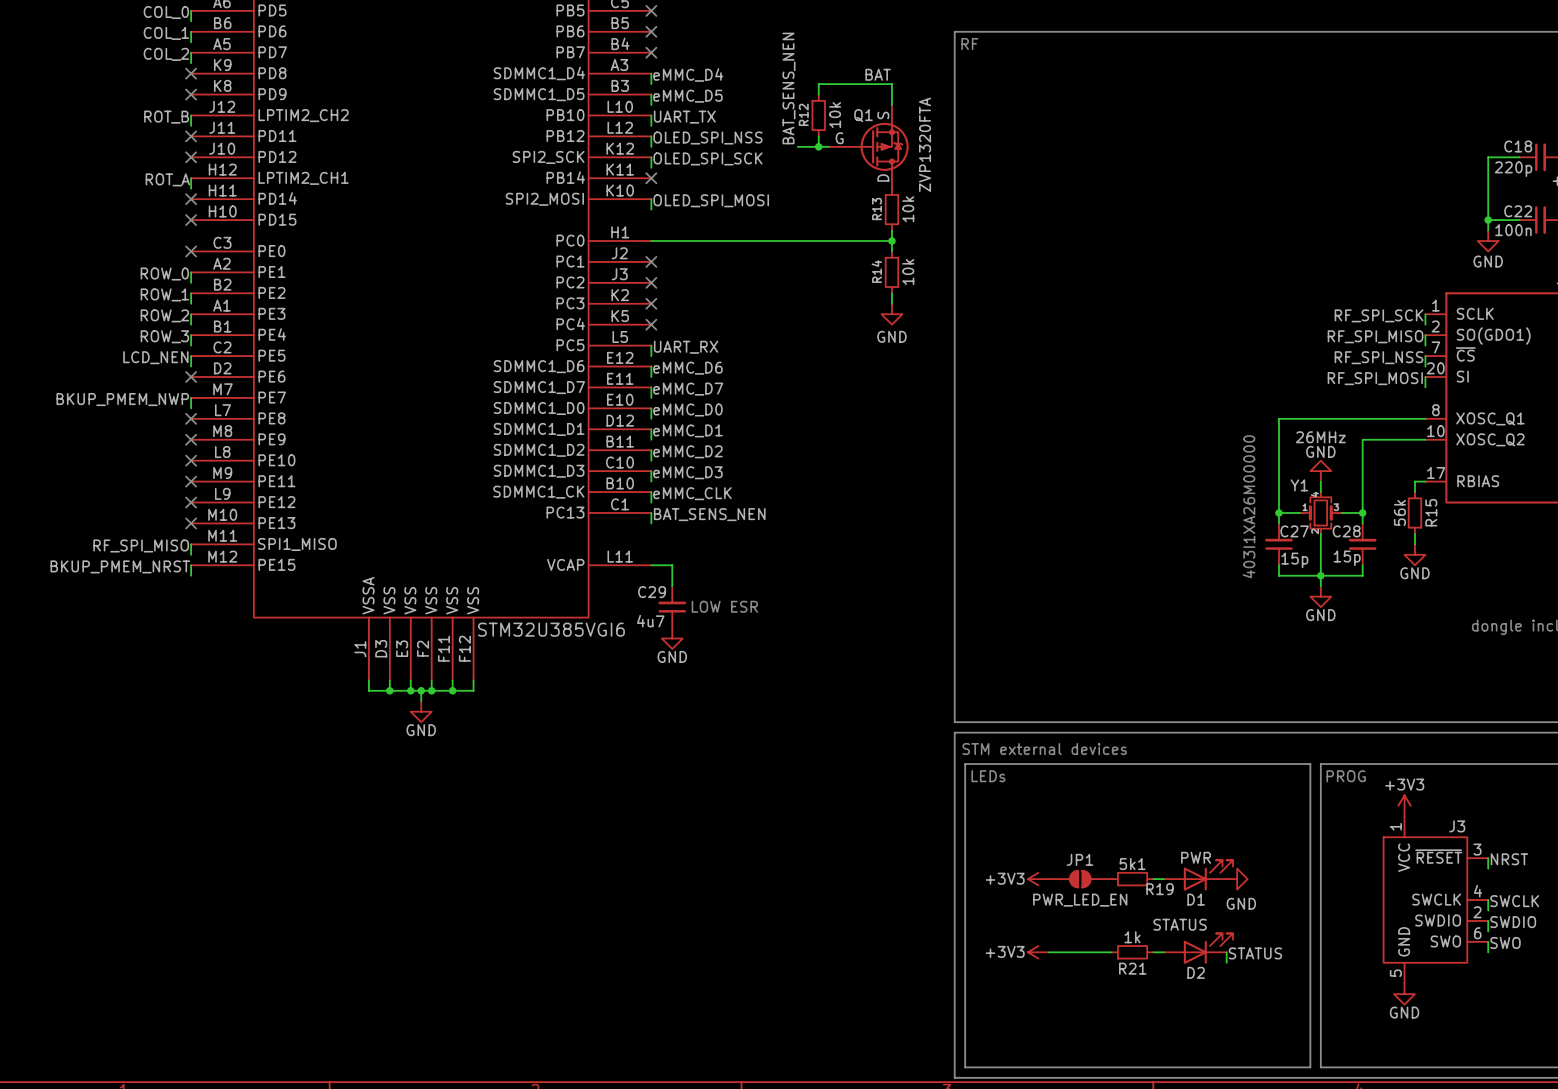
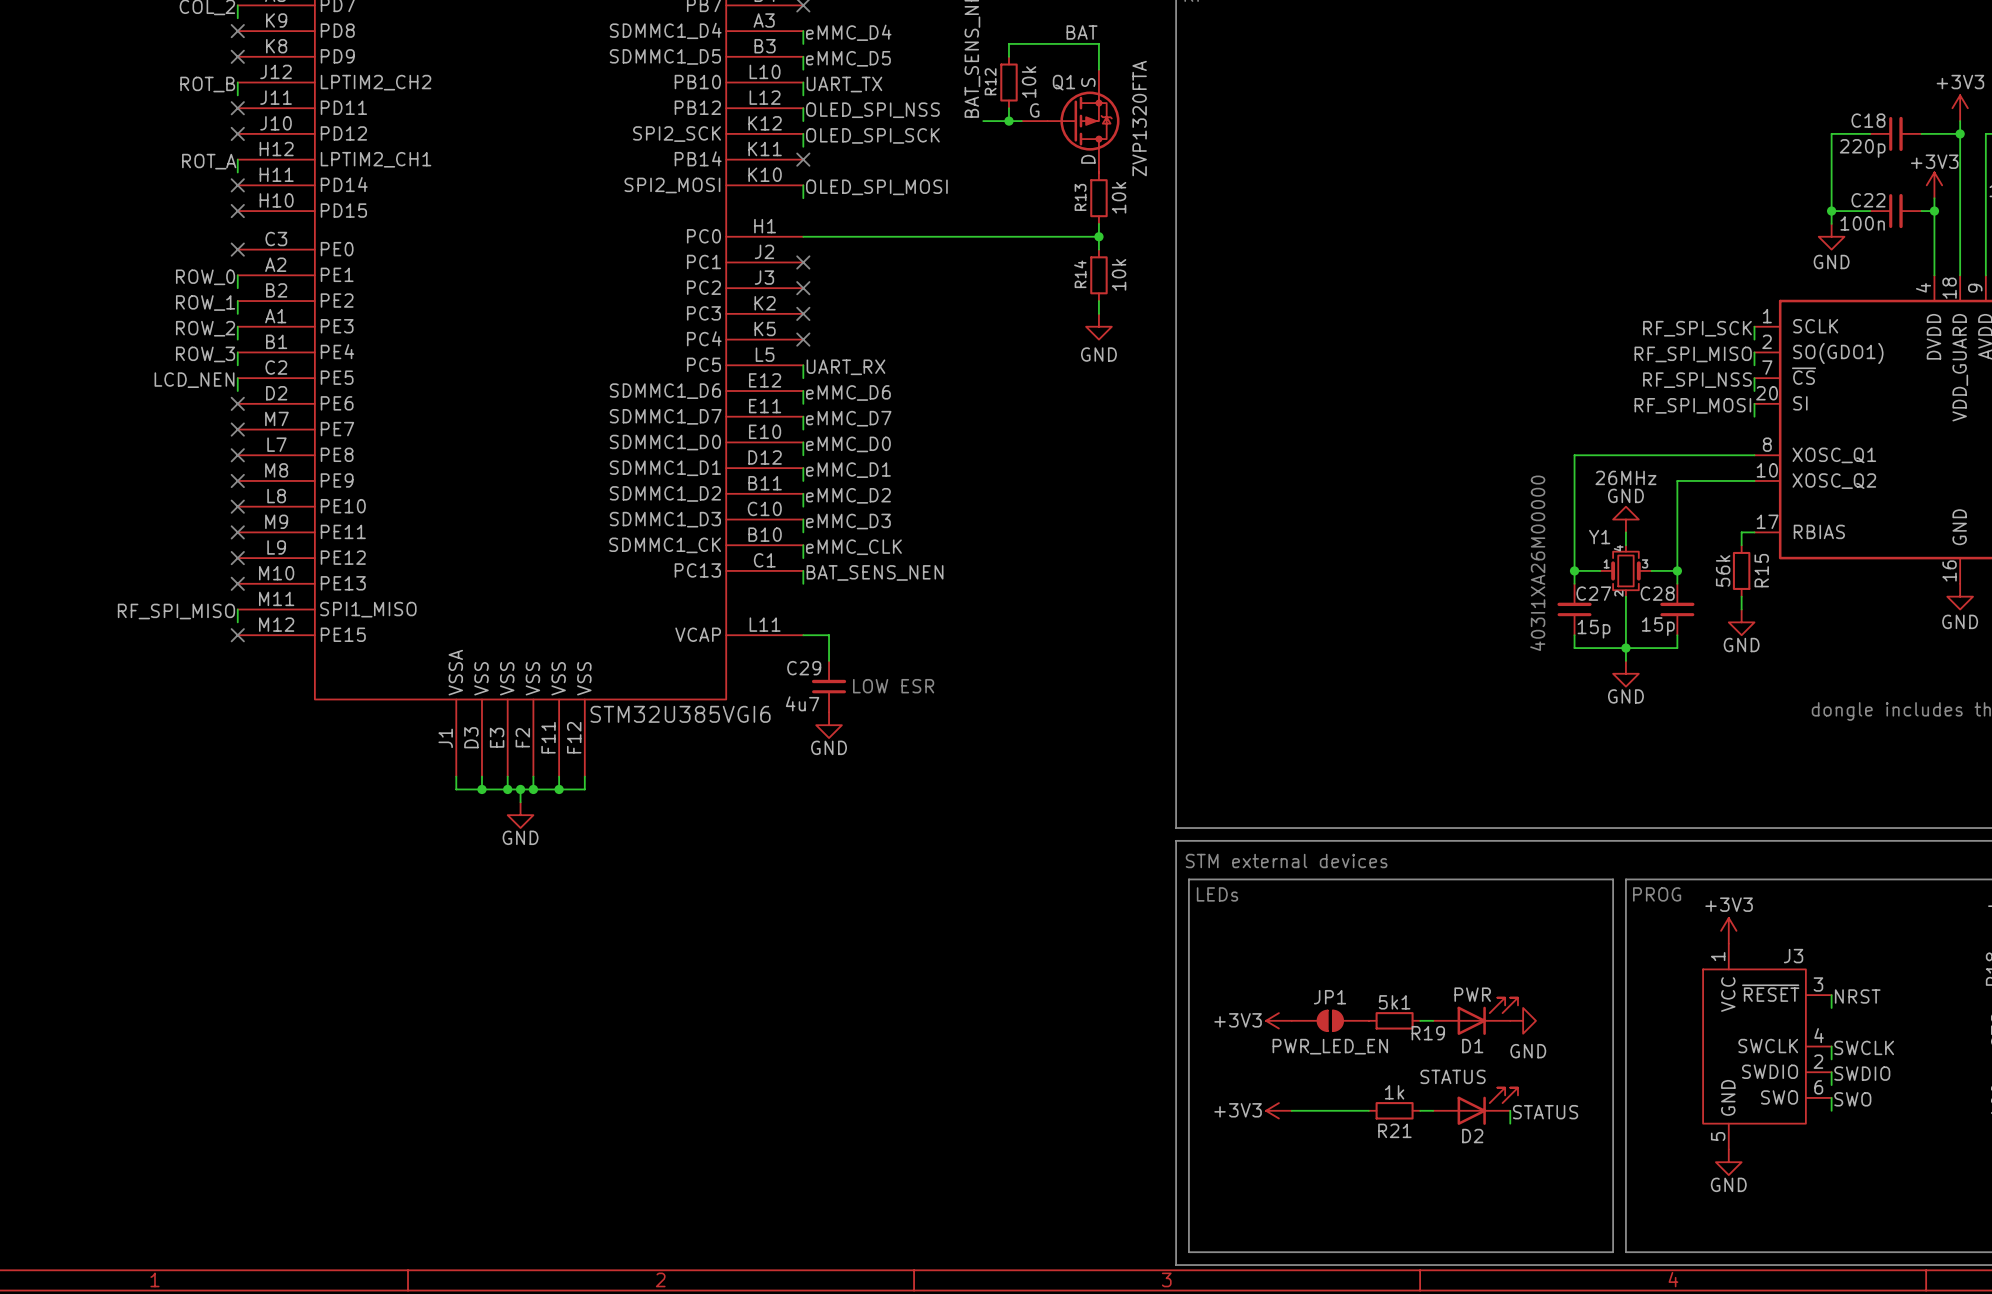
wire: (191, 397) (191, 408) -> none
no-connect mark: none -> (237, 429)
label: BKUP_PMEM_NWP (122, 399) -> none
wire: (191, 565) (191, 575) -> none
no-connect mark: none -> (237, 635)
label: BKUP_PMEM_NRST (120, 566) -> none

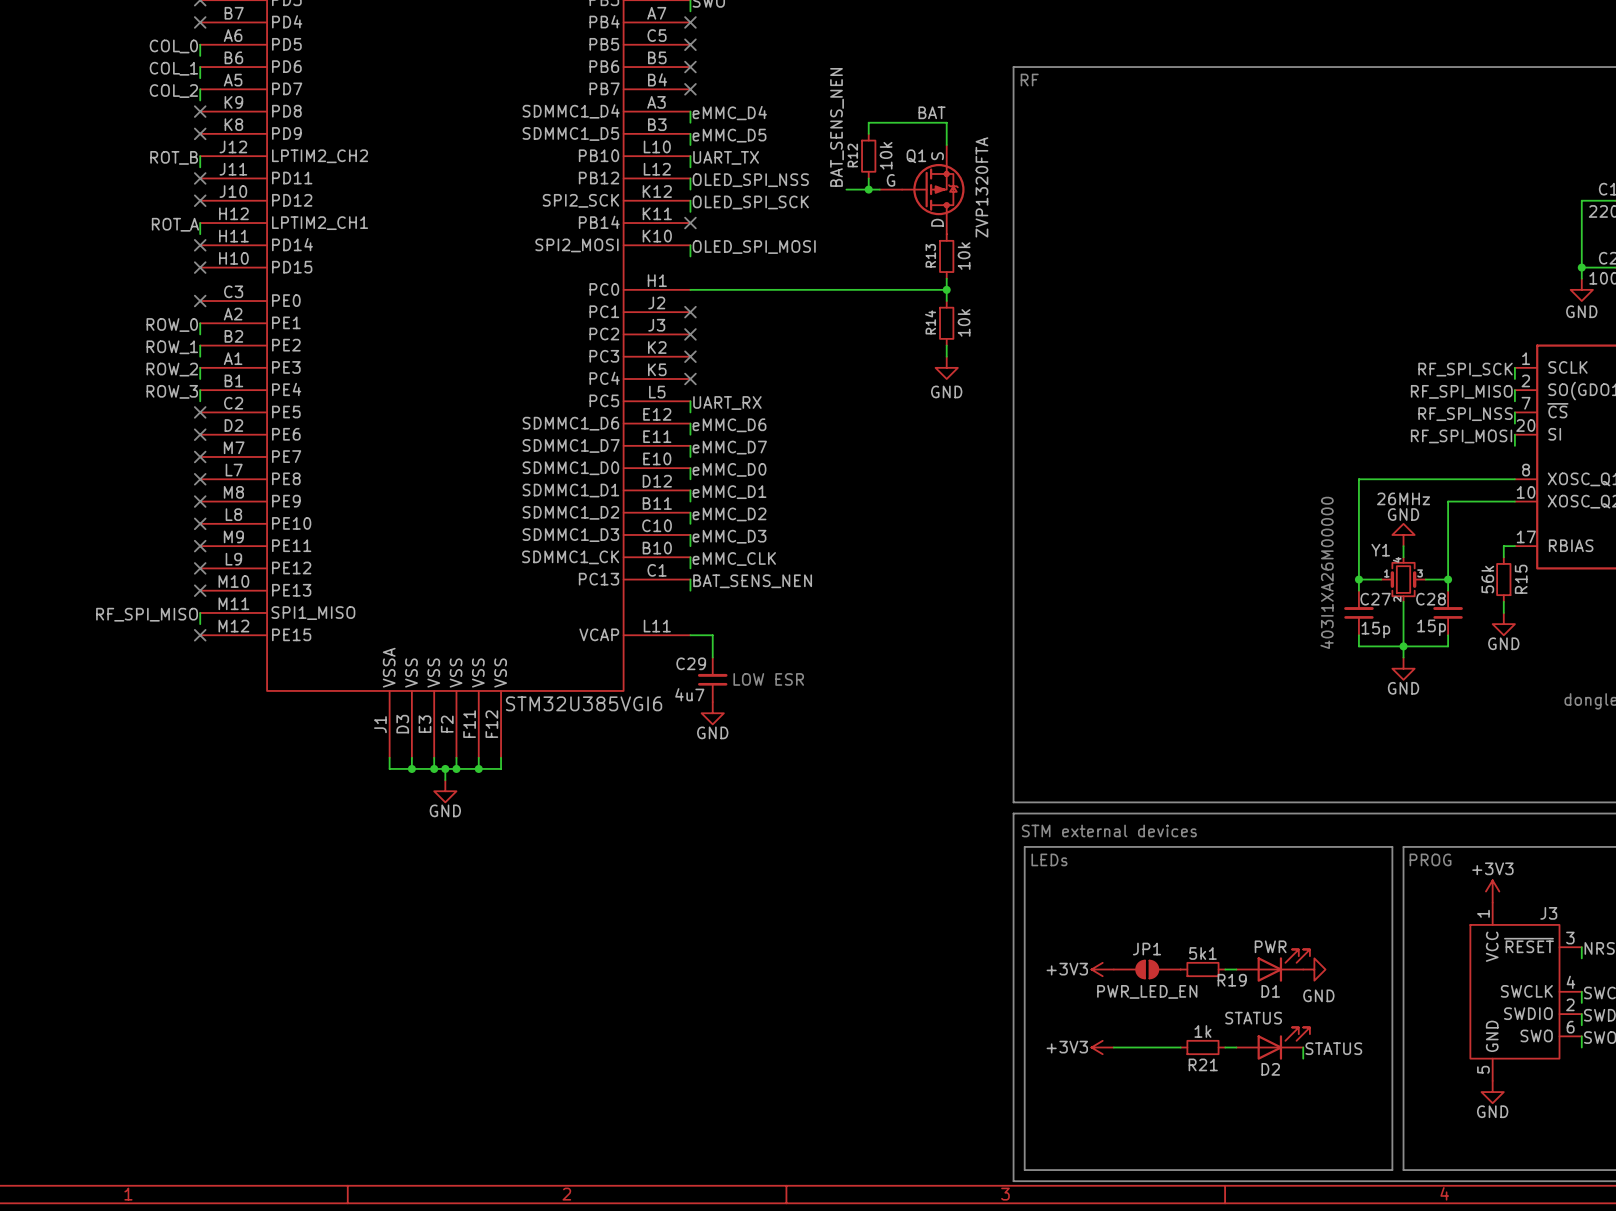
wire: (237, 378) (237, 391) -> none
no-connect mark: none -> (200, 412)
label: LCD_NEN (194, 380) -> none

